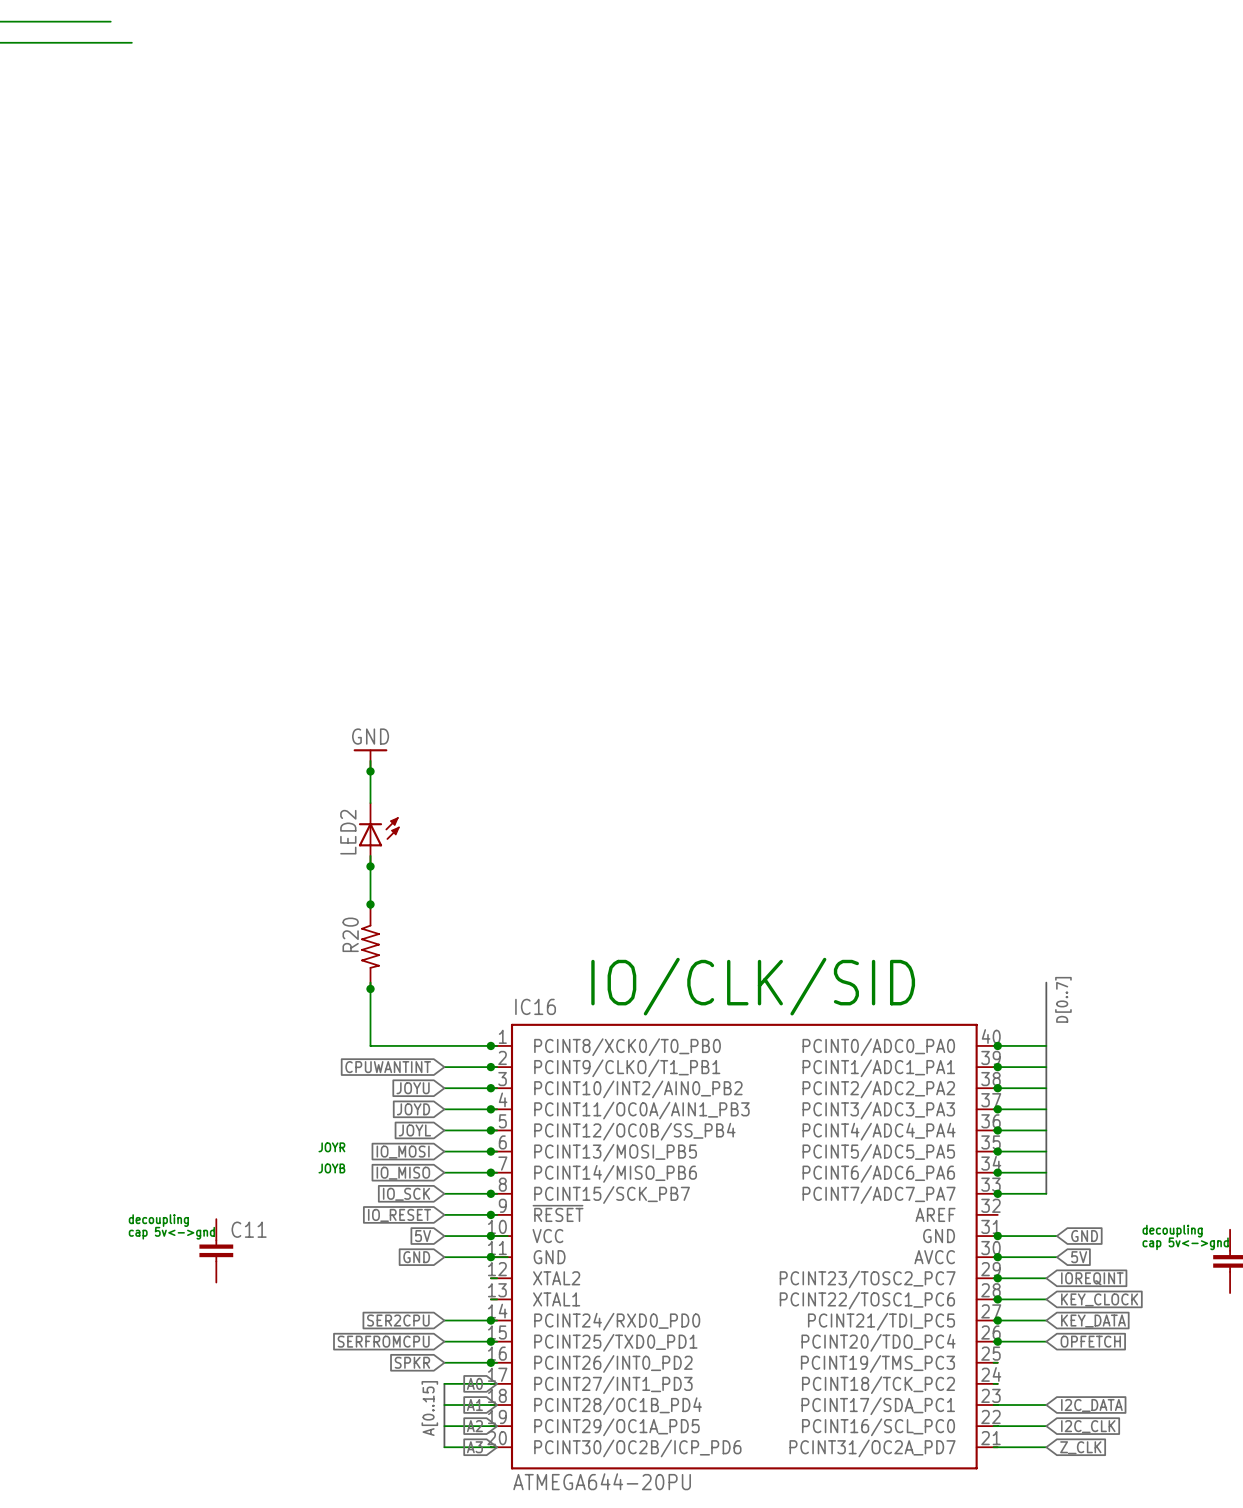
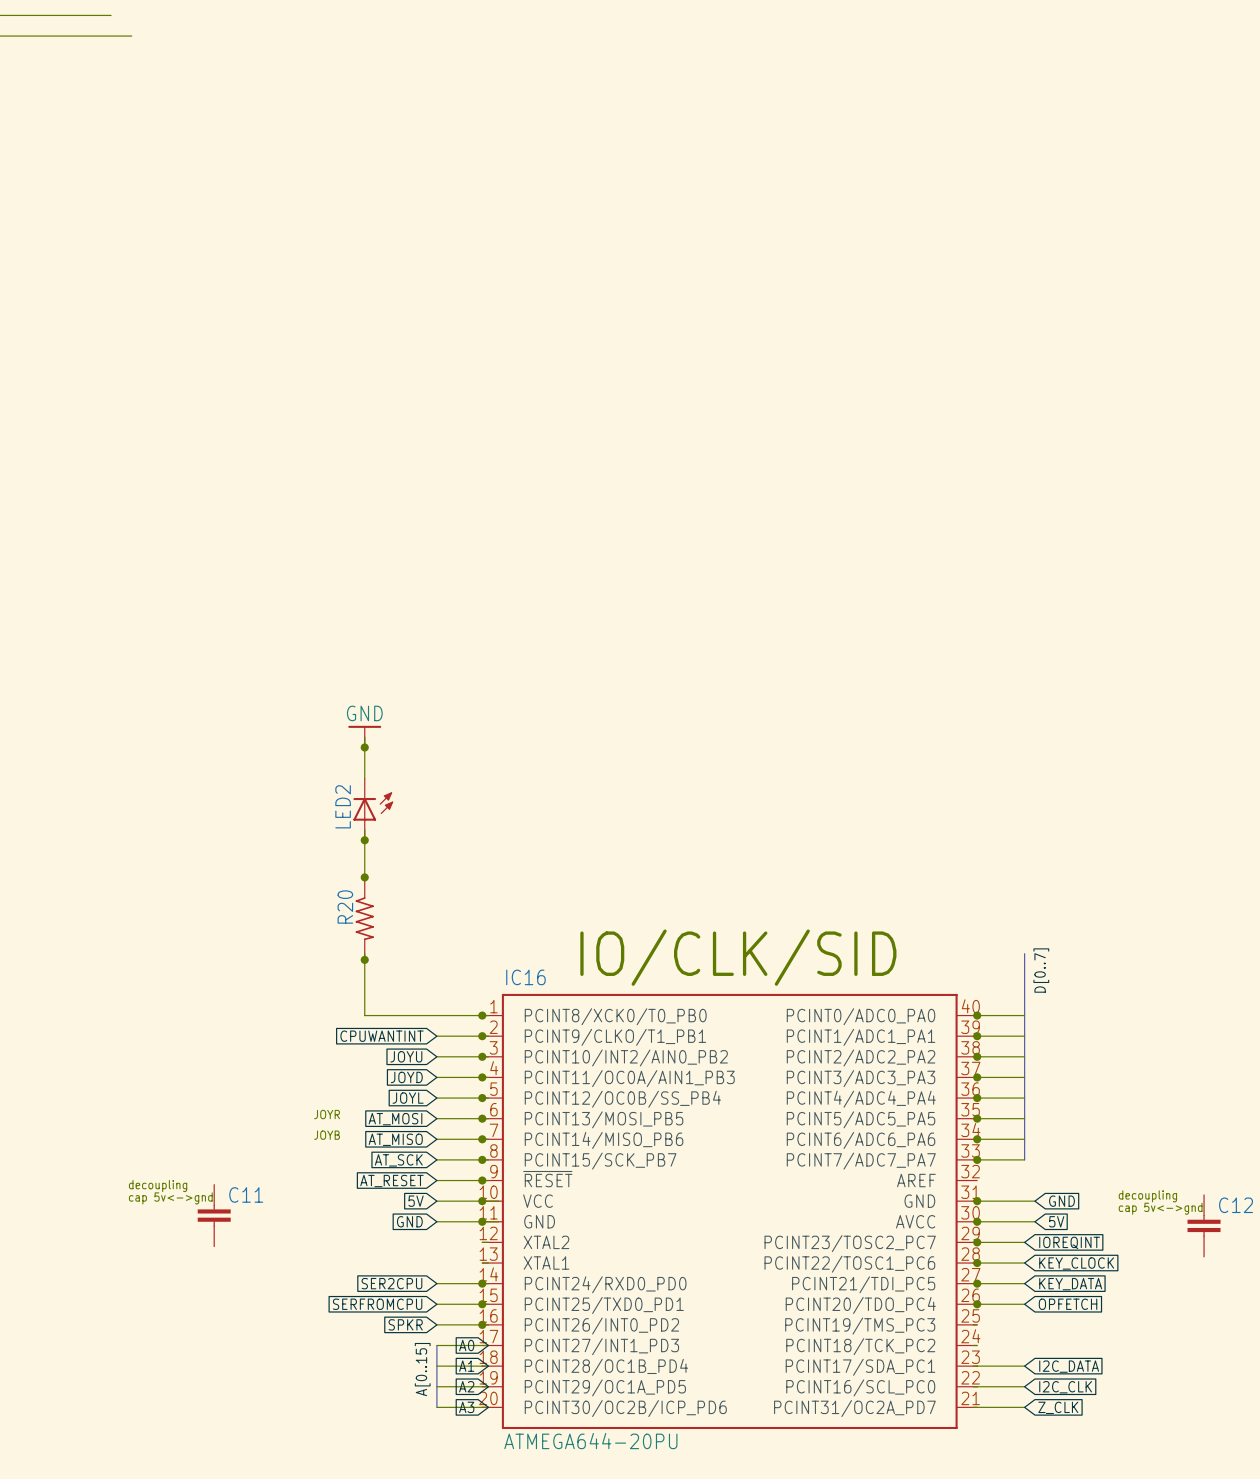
global label: IO_MOSI (403, 1152) -> AT_MOSI (395, 1119)
global label: IO_MISO (403, 1173) -> AT_MISO (395, 1139)
global label: IO_SCK (406, 1194) -> AT_SCK (398, 1160)
global label: IO_RESET (399, 1215) -> AT_RESET (391, 1181)

